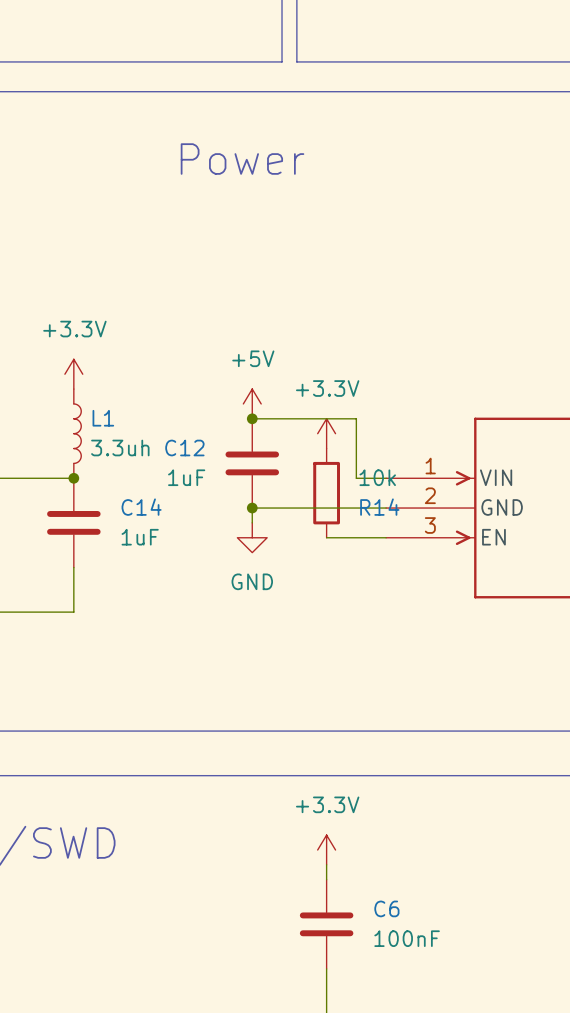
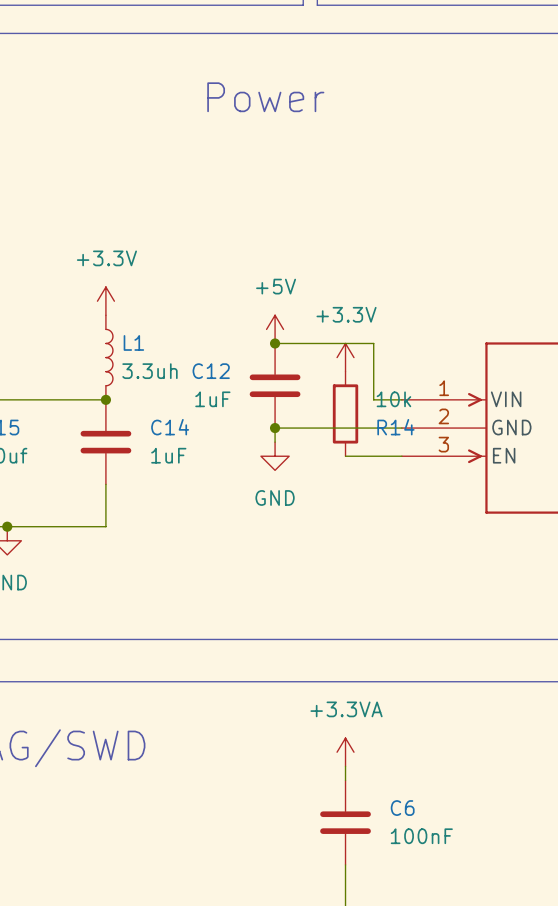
power symbol: +3.3V (326, 850) -> +3.3VA (345, 752)

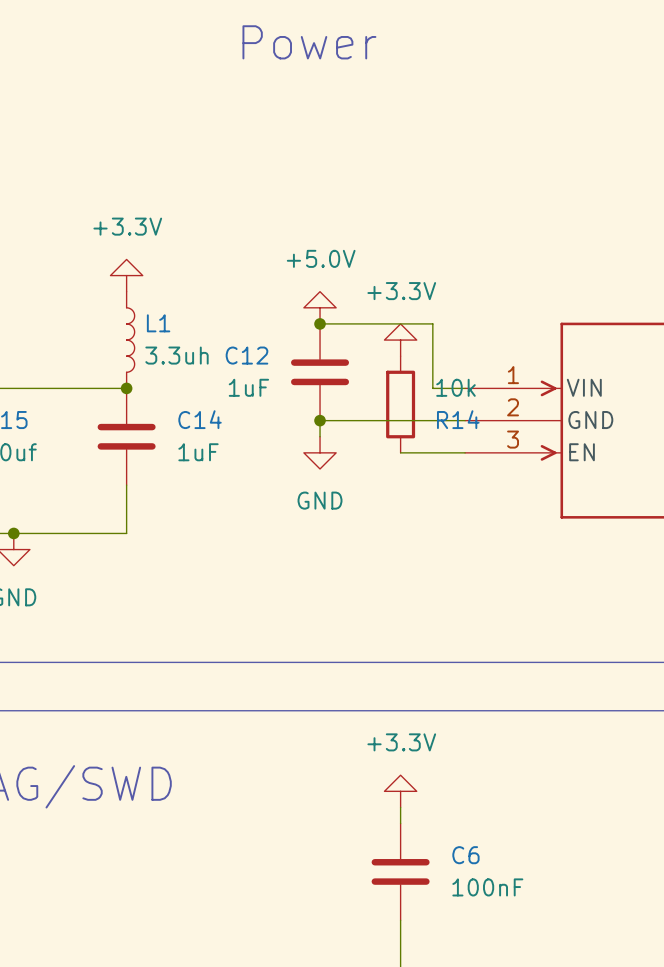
power symbol shape: [97, 287, 115, 316] -> [110, 259, 143, 292]
power symbol: +5V (275, 329) -> +5.0V (320, 307)
power symbol shape: [337, 343, 354, 372] -> [384, 323, 417, 357]
power symbol: +3.3VA (345, 752) -> +3.3V (400, 791)

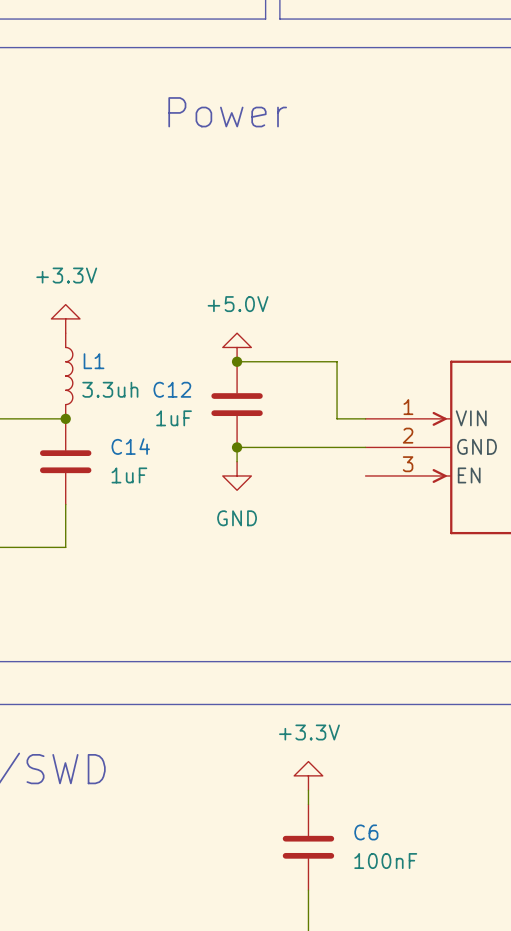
power symbol: +3.3V (400, 340) -> none
R14: 10k (400, 404) -> none
wire: (400, 452) (465, 452) -> none

